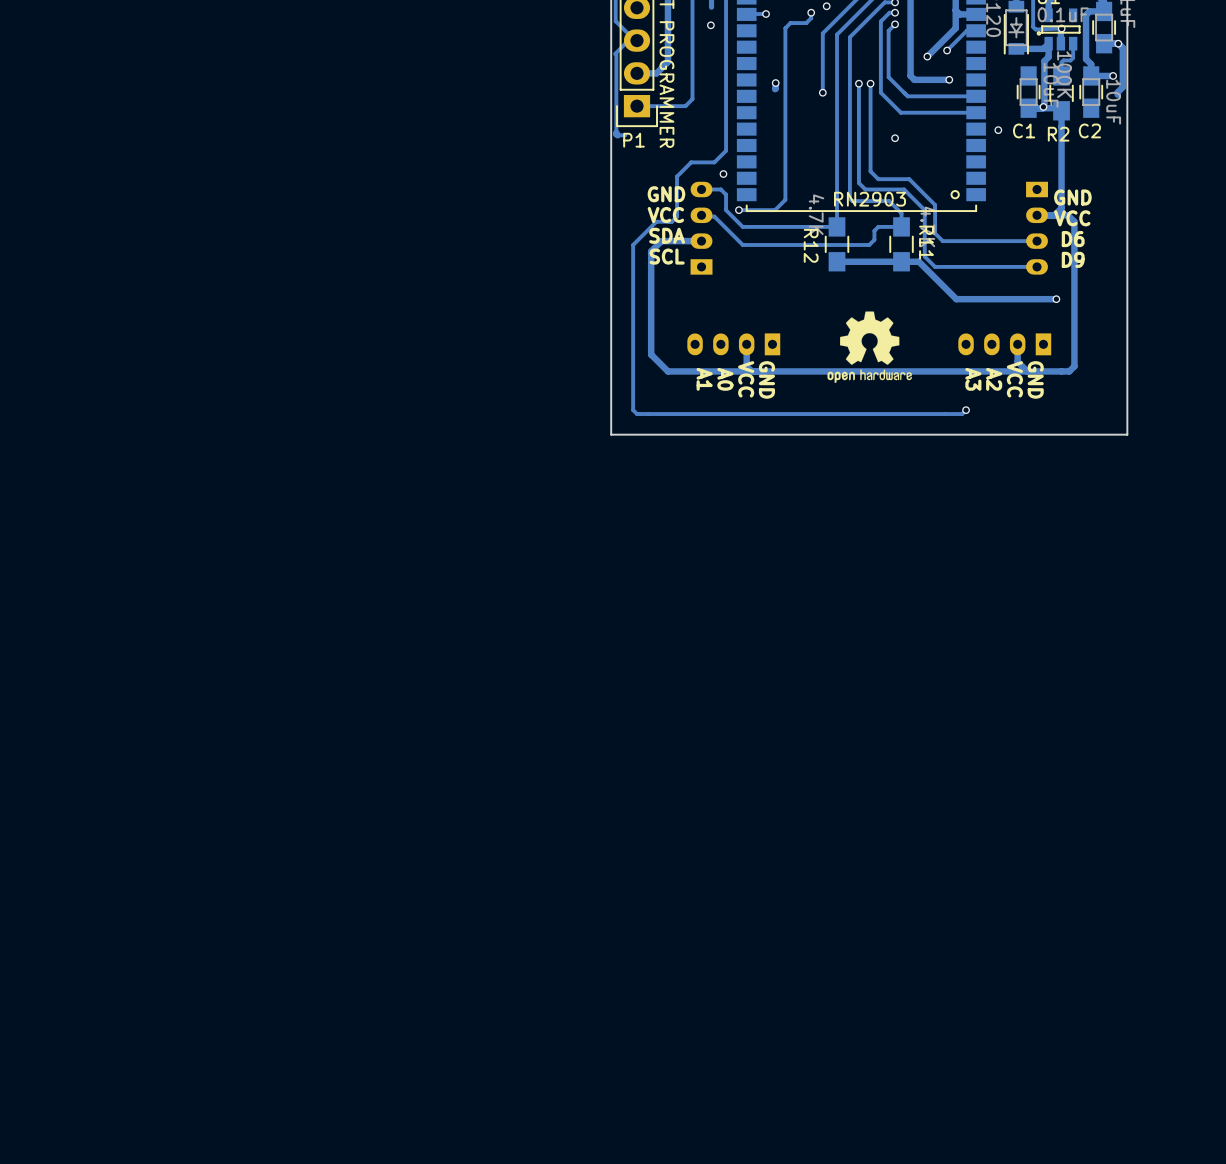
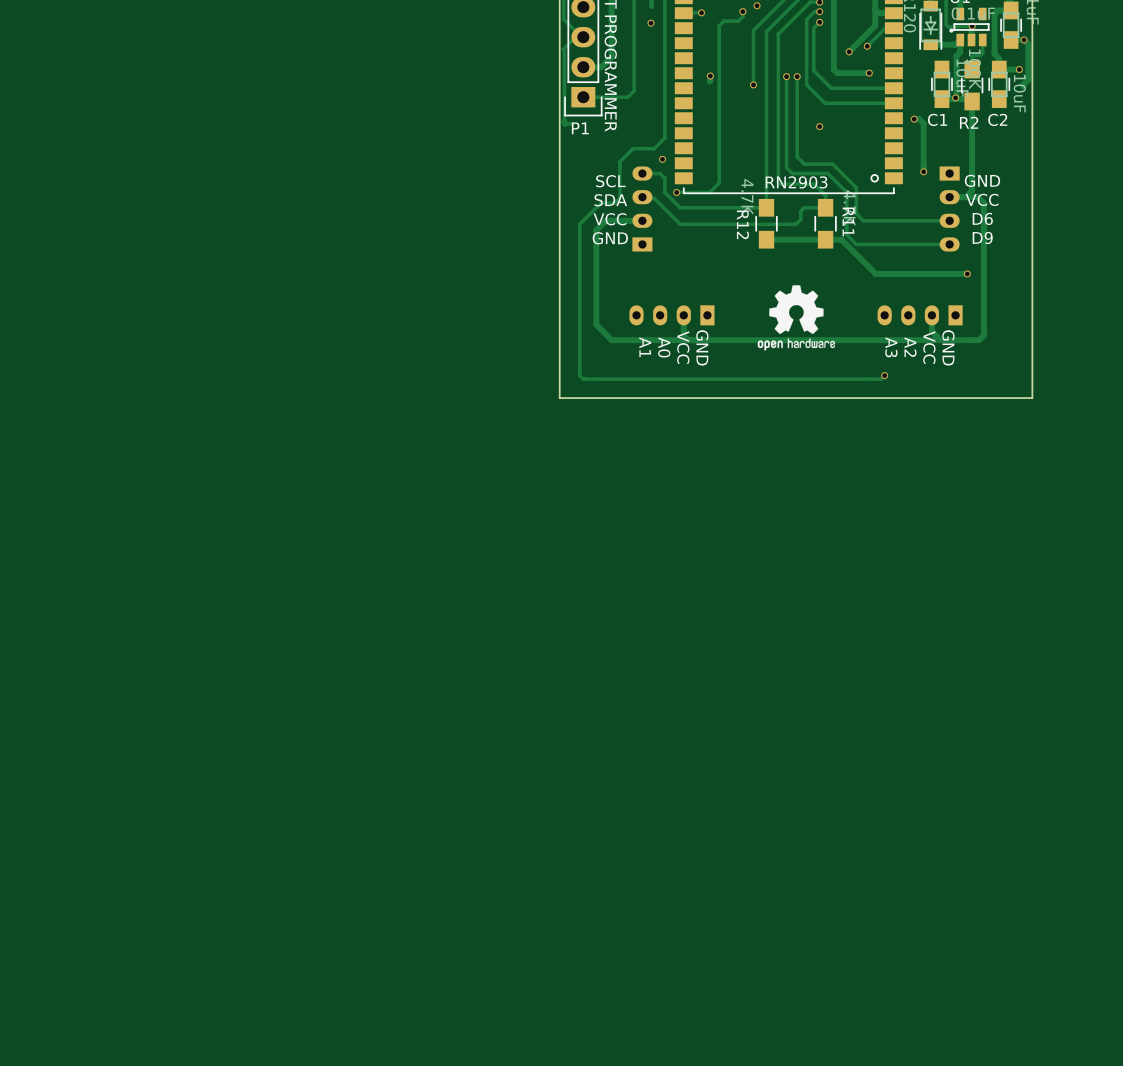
track: none -> (914, 119) (919, 119) (923, 123) (923, 171)
via: none -> (923, 171)
text: GND (666, 194) -> SCL (610, 181)
text: VCC (665, 215) -> SDA (610, 200)
text: SDA (667, 235) -> VCC (609, 219)
text: SCL (667, 256) -> GND (610, 238)

